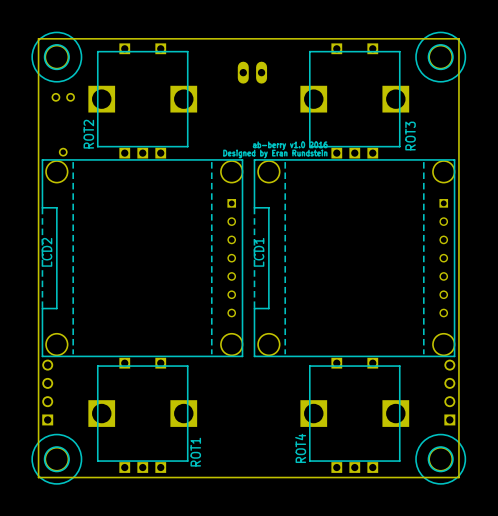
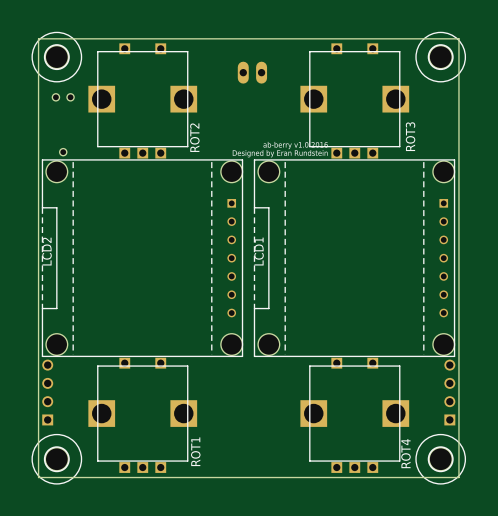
ROT2 name position: ROT2 (88, 134) -> ROT2 (194, 137)
ROT4 name position: ROT4 (300, 448) -> ROT4 (405, 453)

